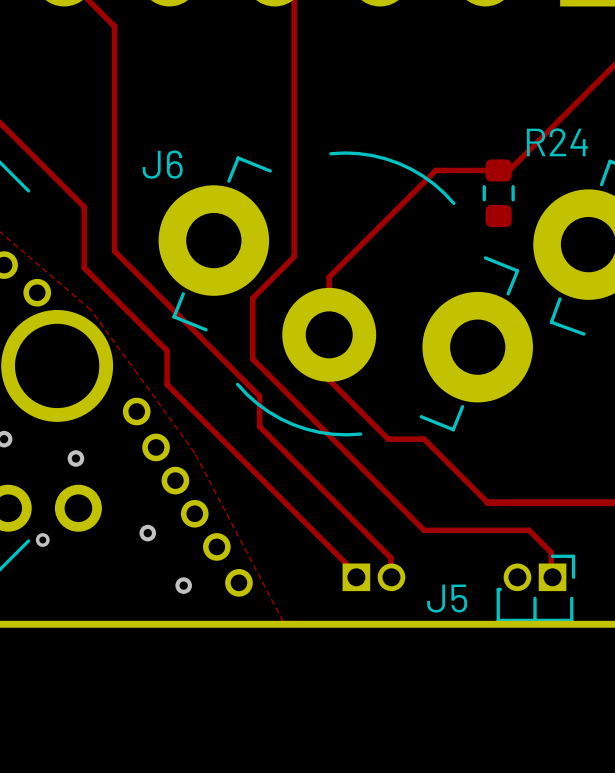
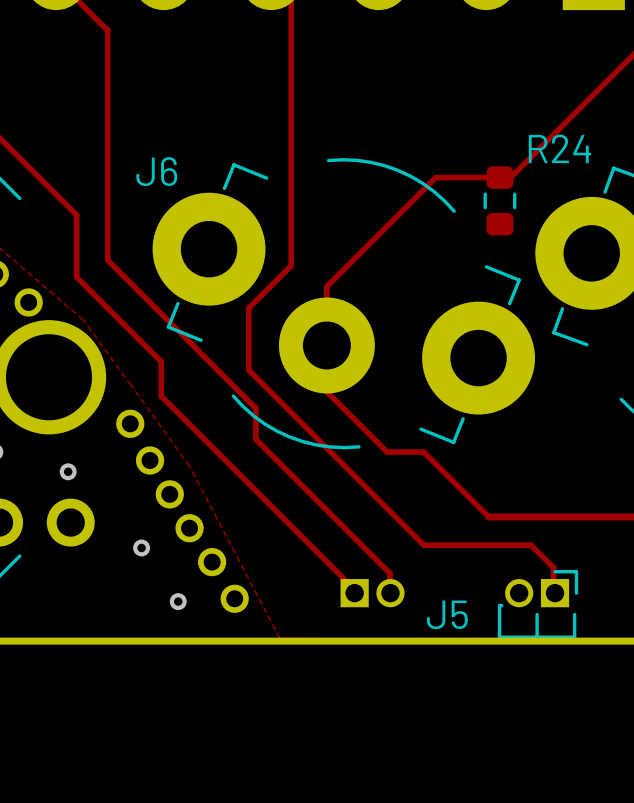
via: (42, 540) -> none

